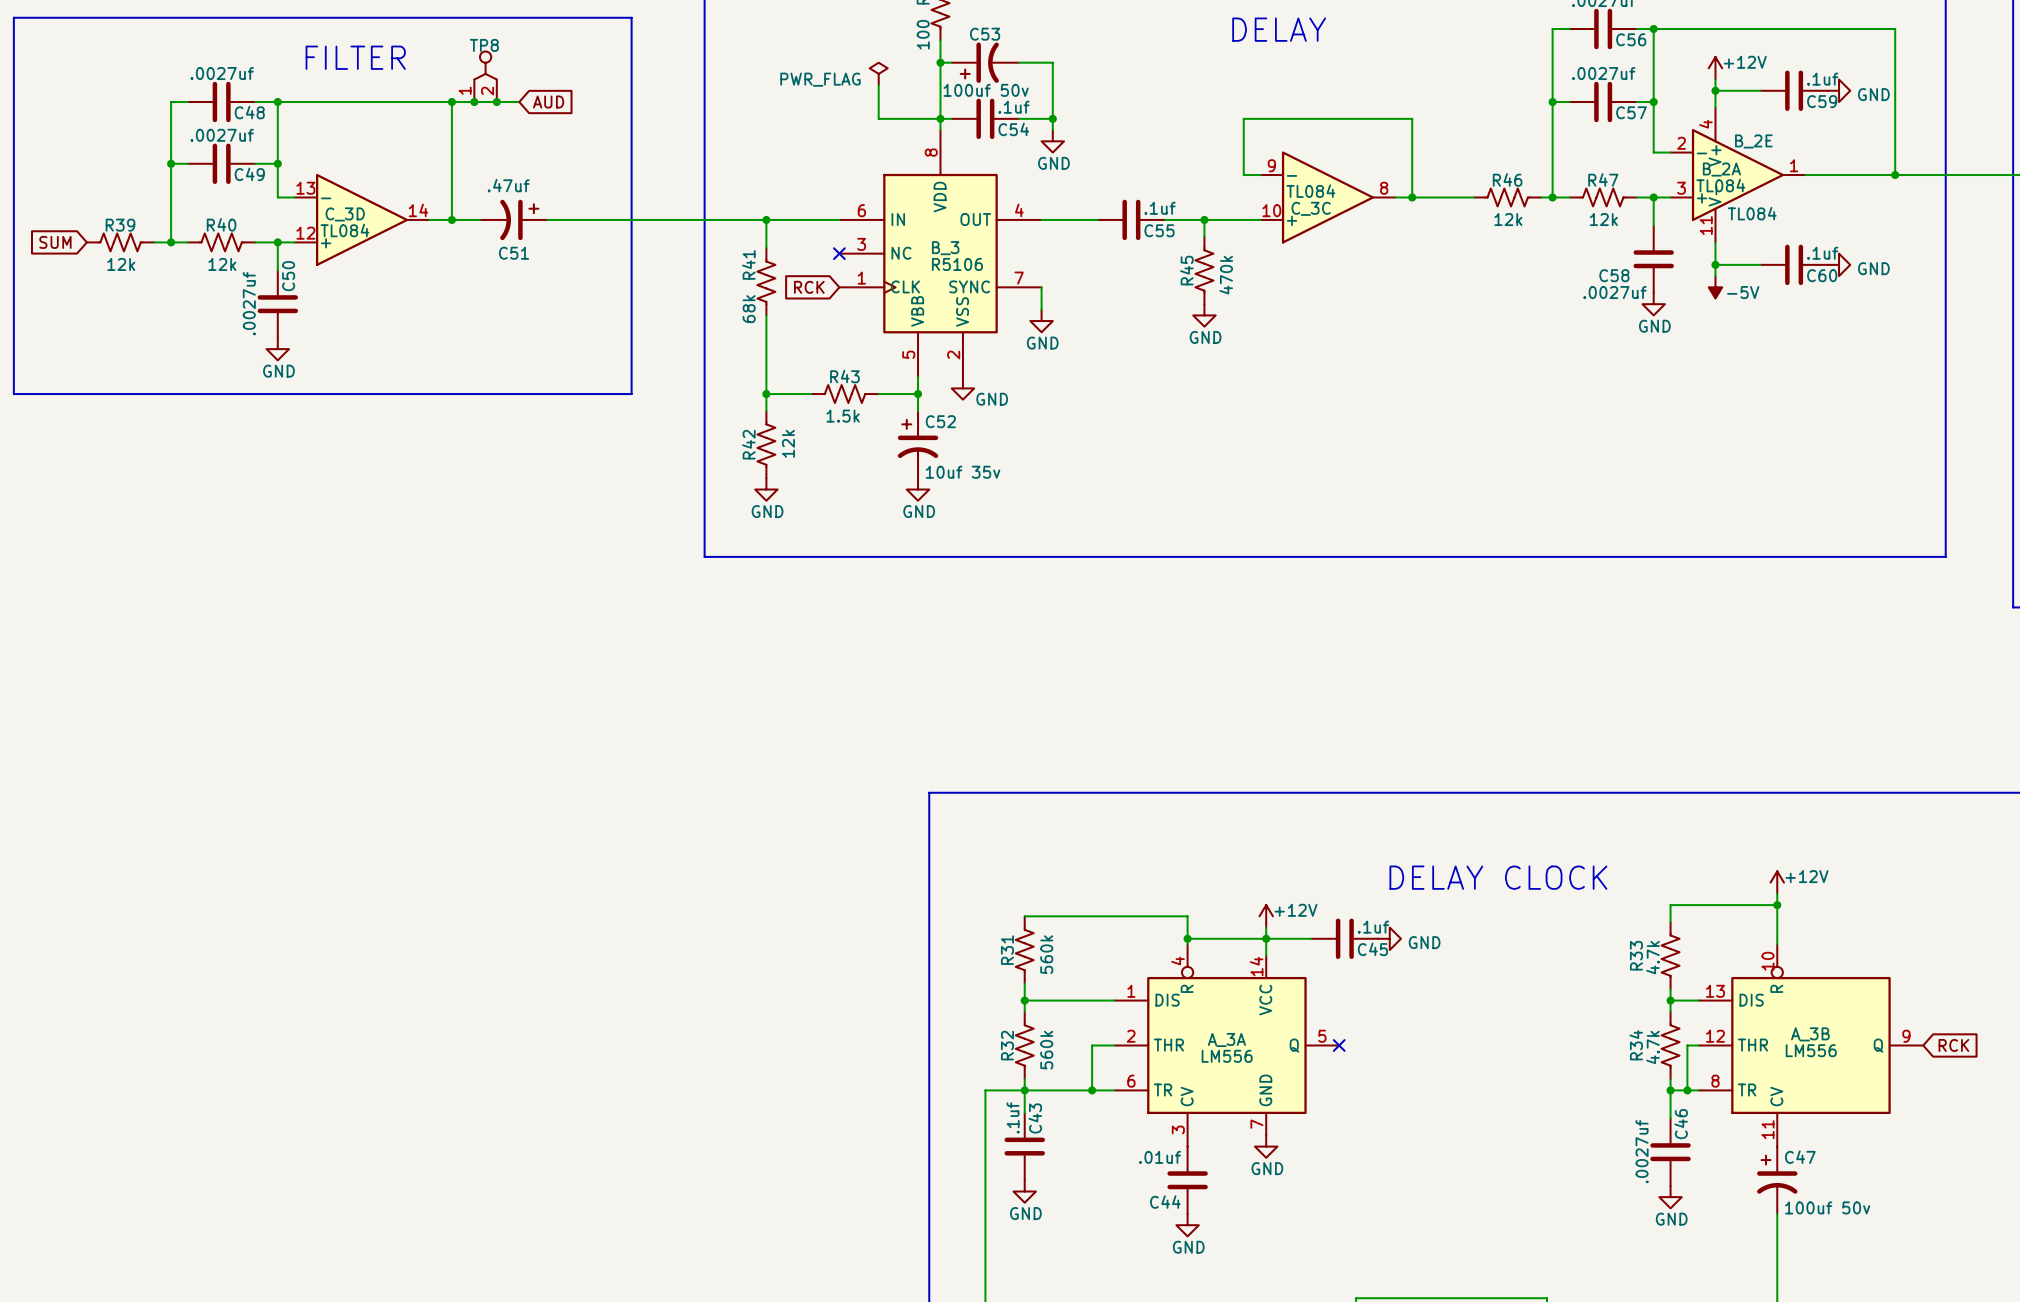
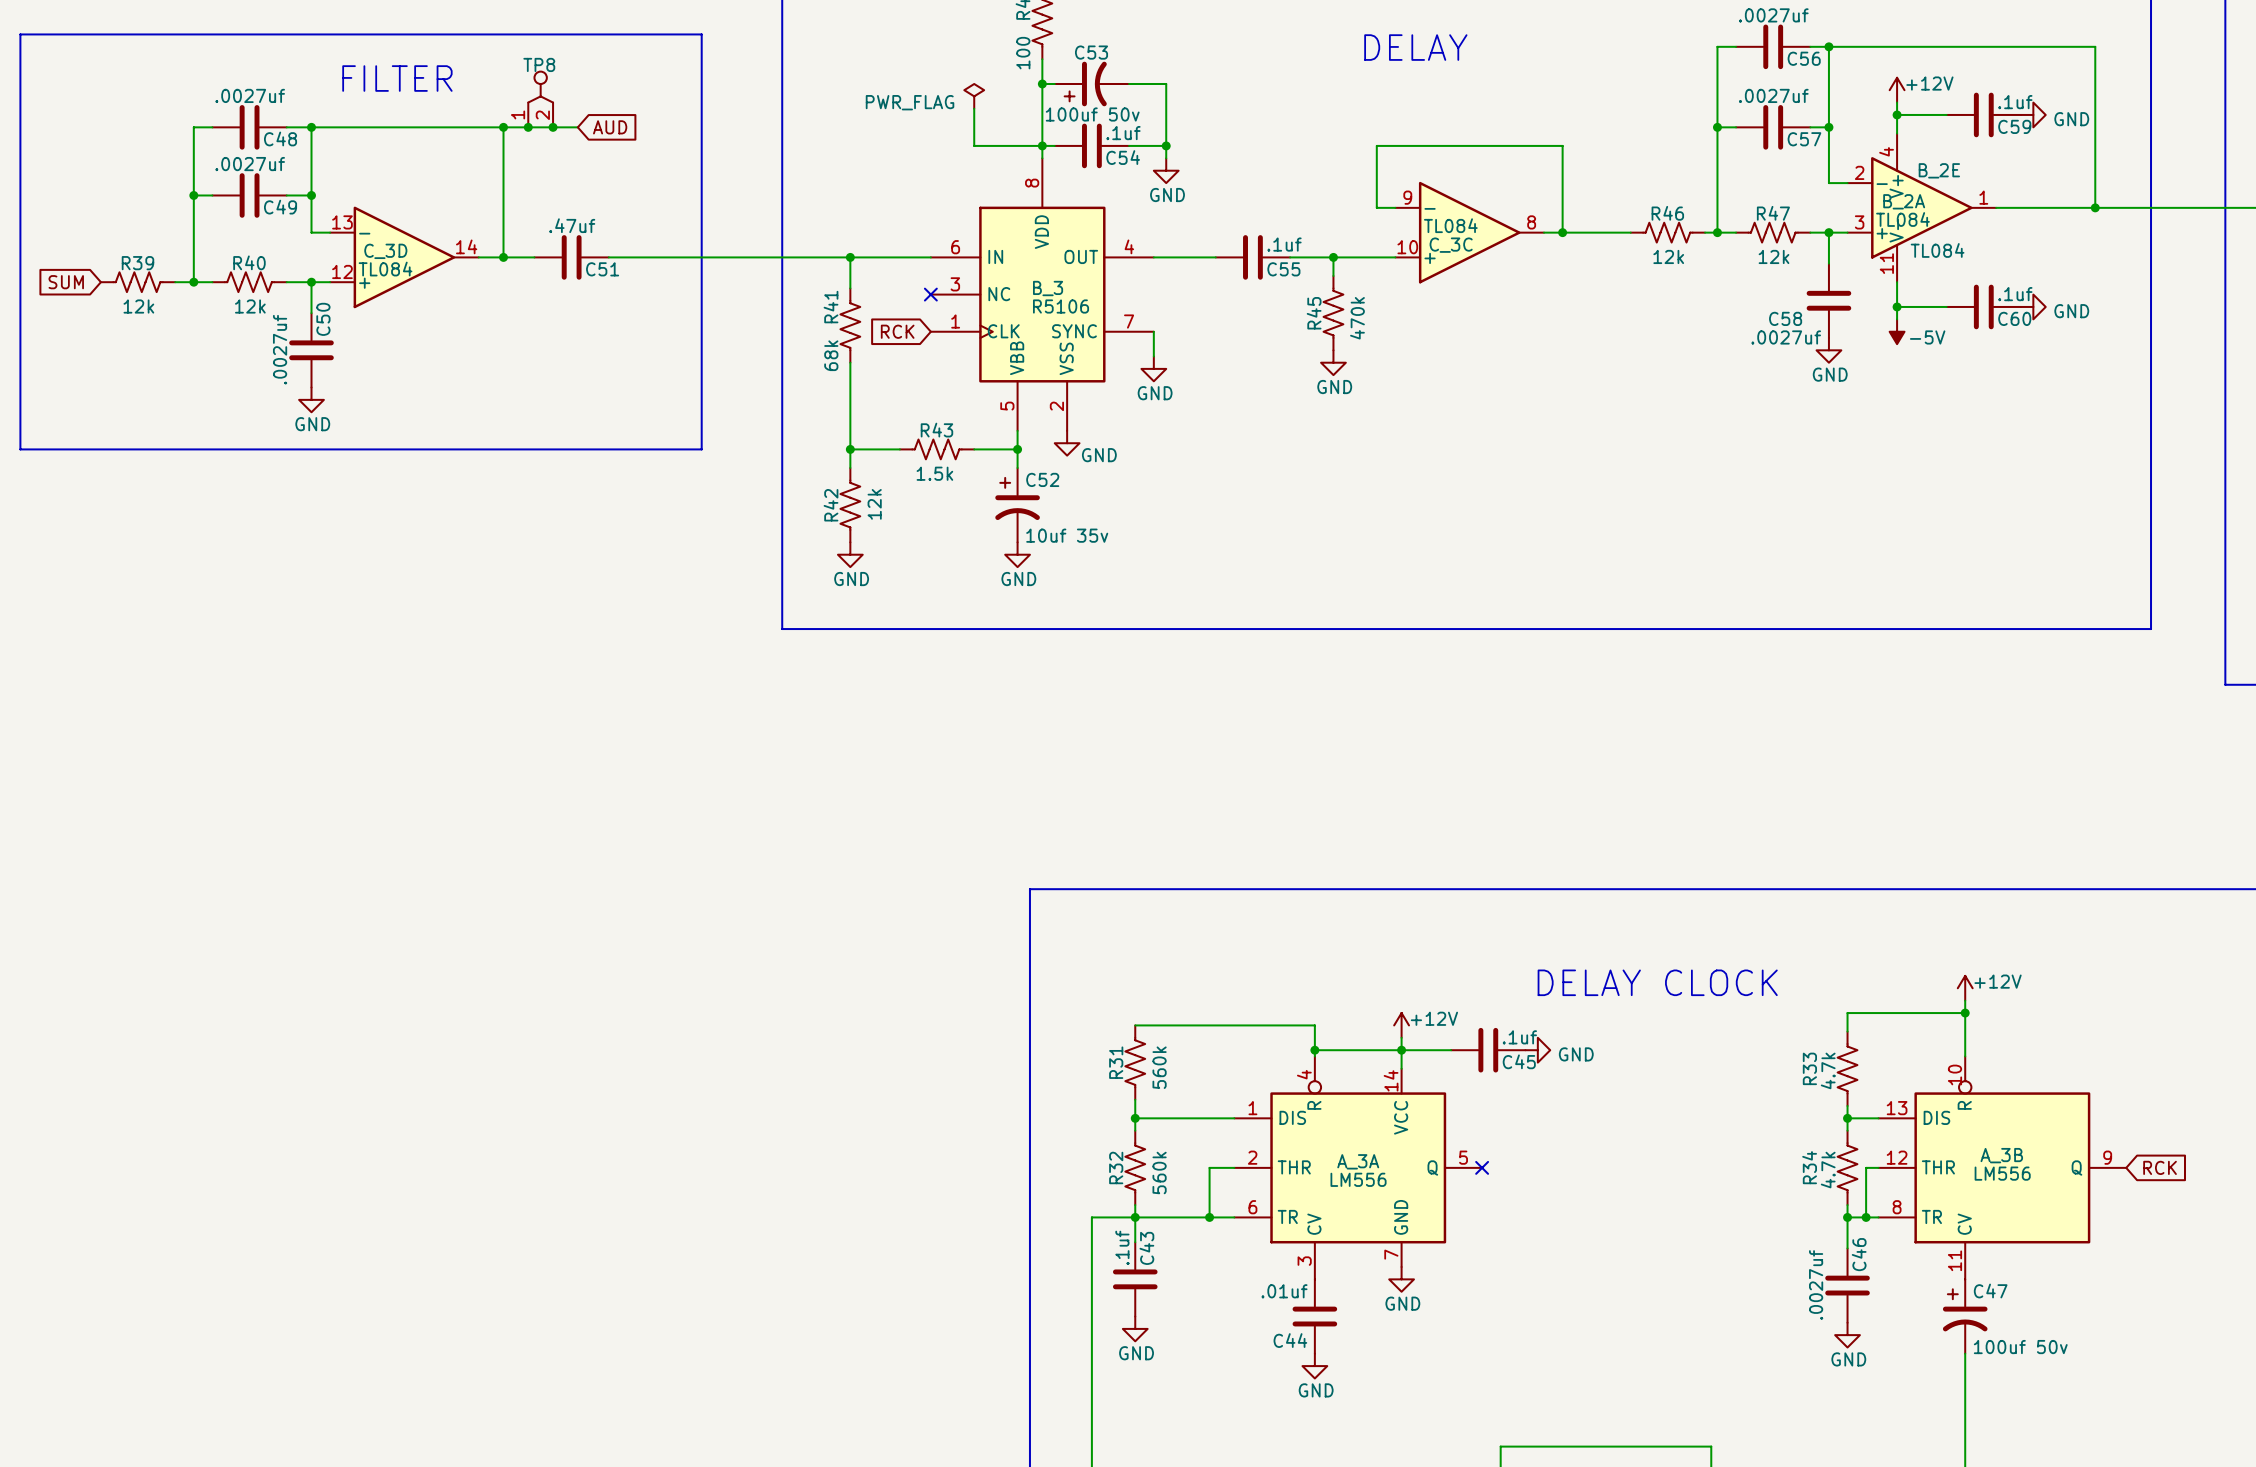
C51 symbol: [479, 199, 548, 241] -> [534, 235, 609, 280]
C51 name position: C51 (514, 253) -> C51 (602, 269)

